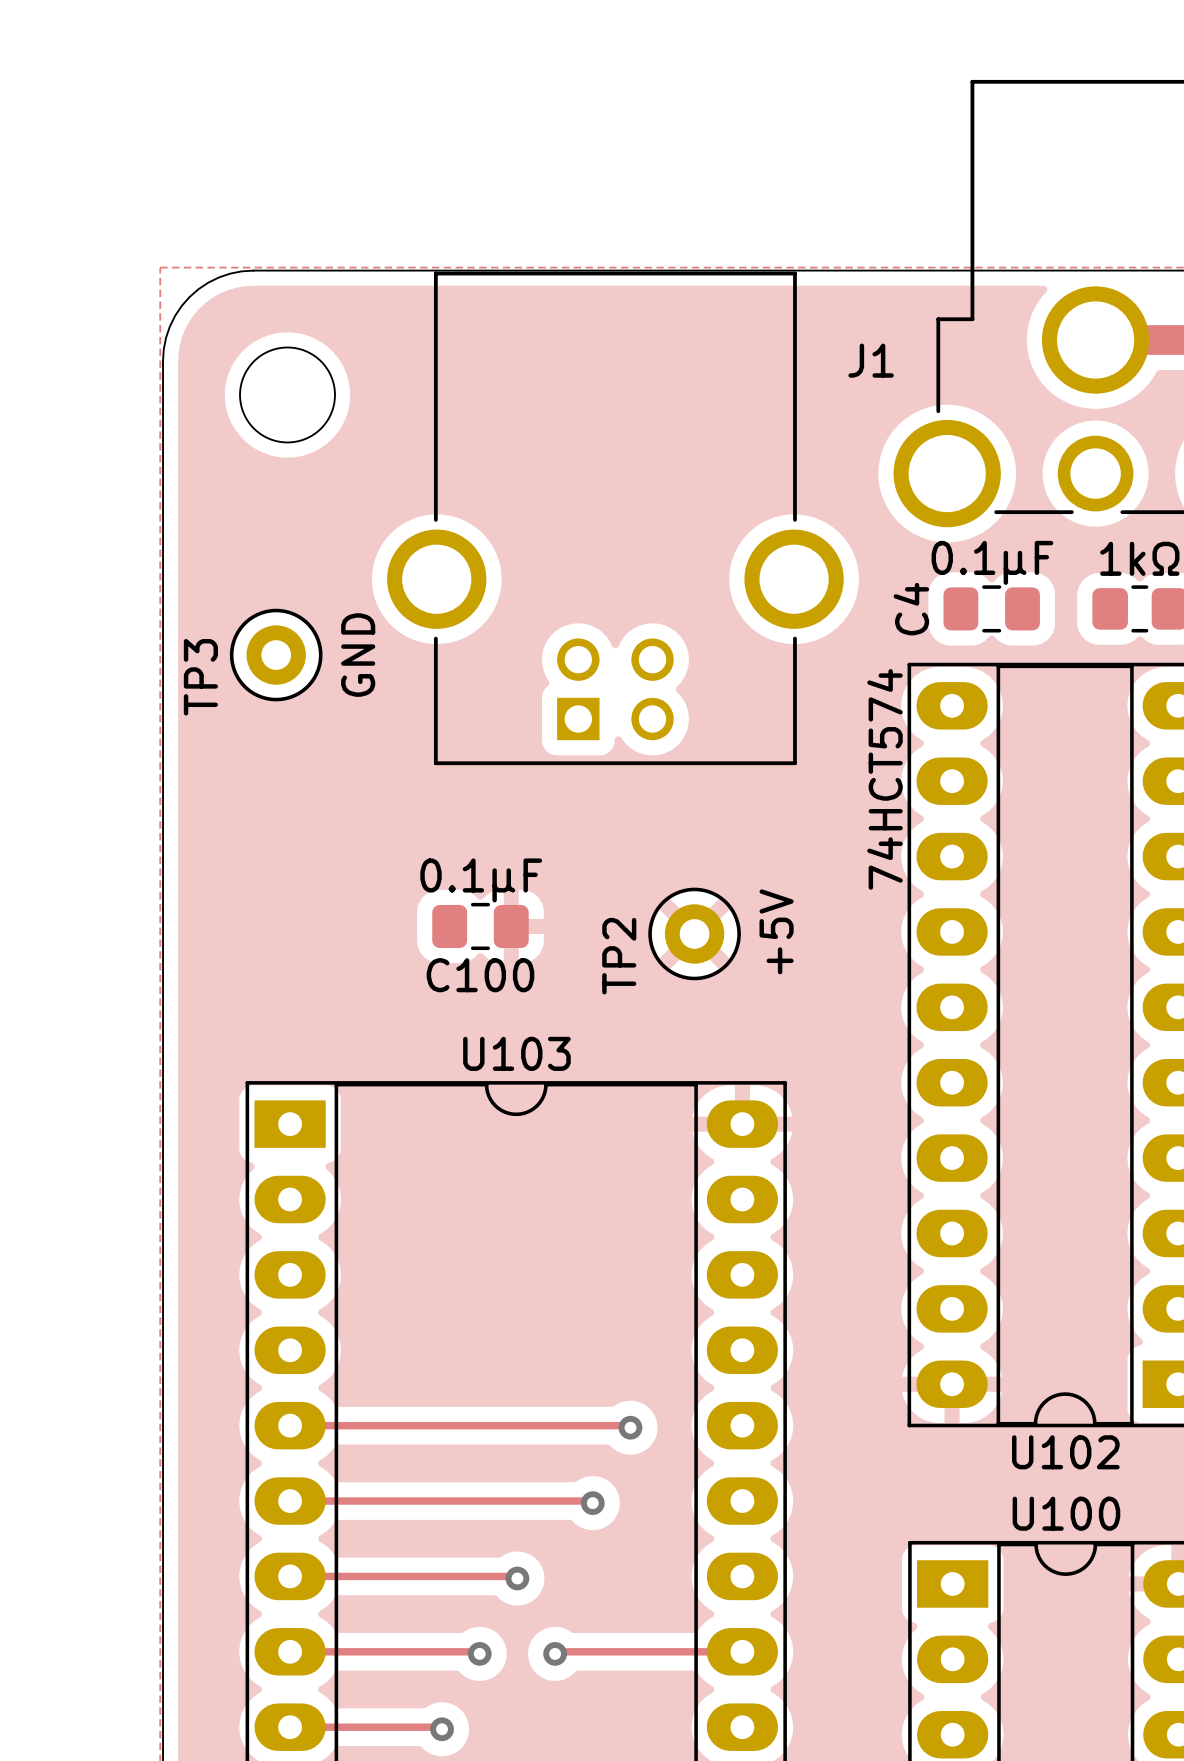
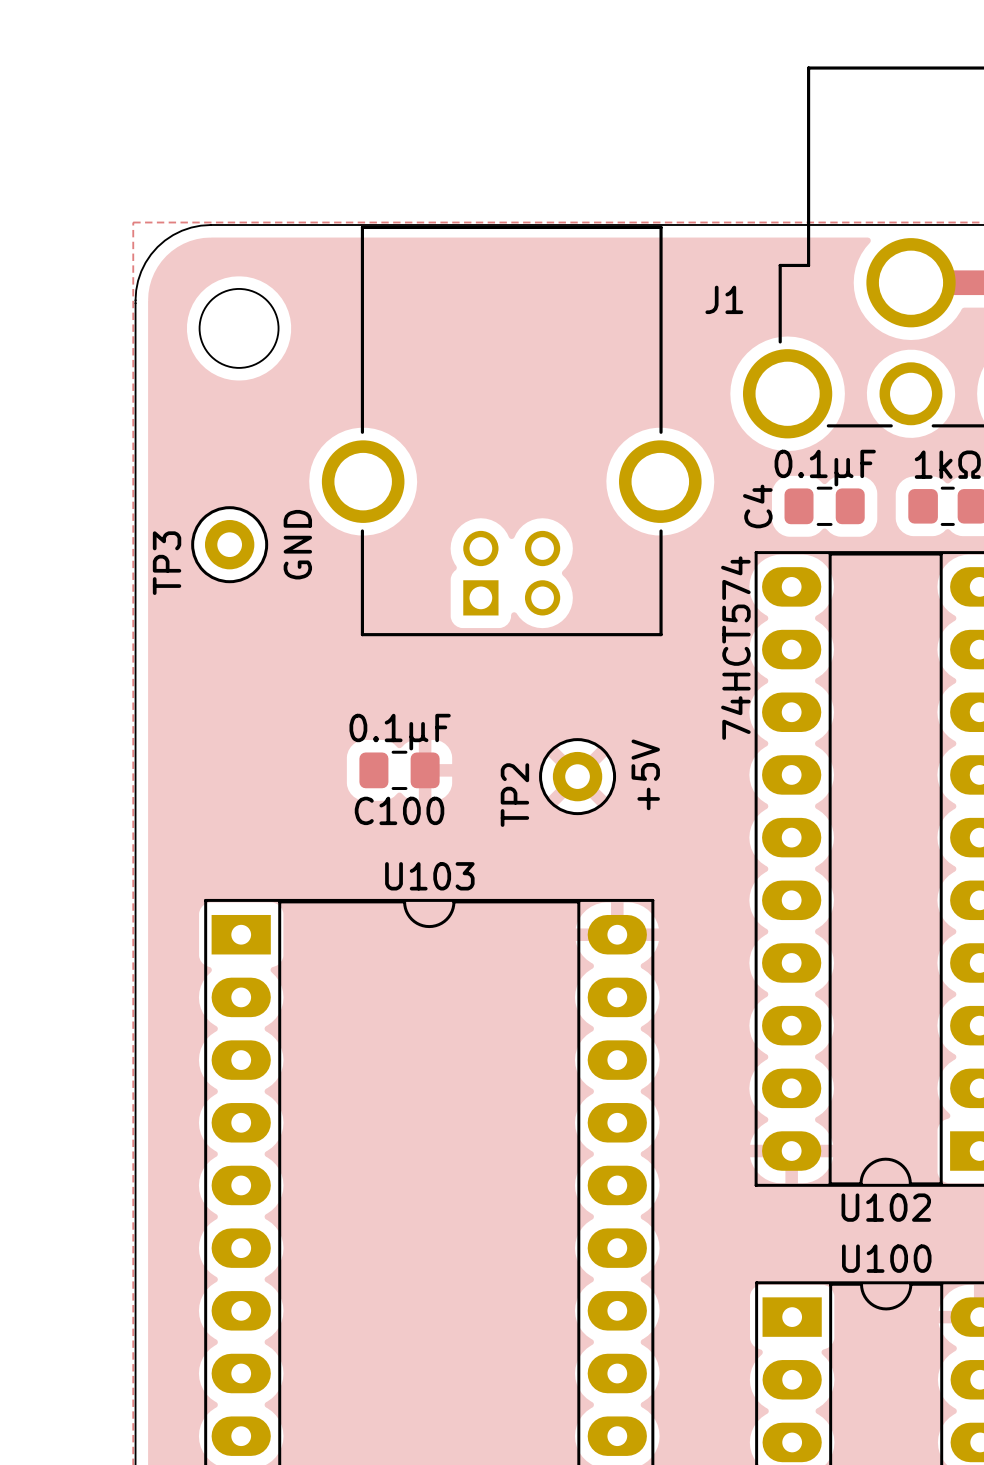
track: (290, 1425) (628, 1425) (630, 1427) -> none
via: (630, 1427) -> none
track: (290, 1501) (590, 1501) (592, 1503) -> none
via: (592, 1503) -> none
track: (290, 1576) (515, 1576) (517, 1578) -> none
via: (517, 1578) -> none
track: (290, 1651) (477, 1651) (479, 1653) -> none
track: (742, 1651) (557, 1651) (555, 1653) -> none
via: (479, 1653) -> none
via: (555, 1653) -> none
track: (290, 1727) (439, 1727) (442, 1729) -> none
via: (442, 1729) -> none

